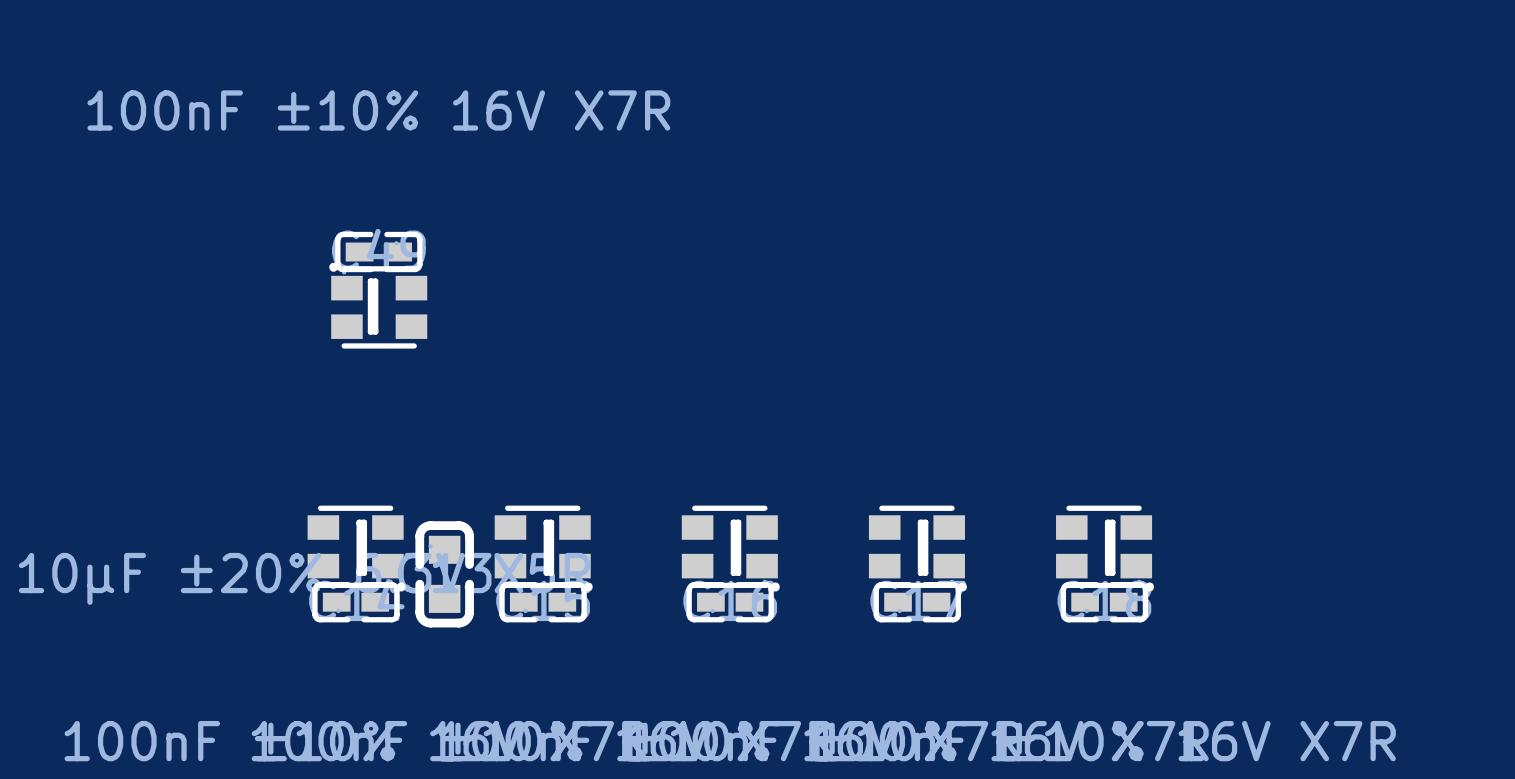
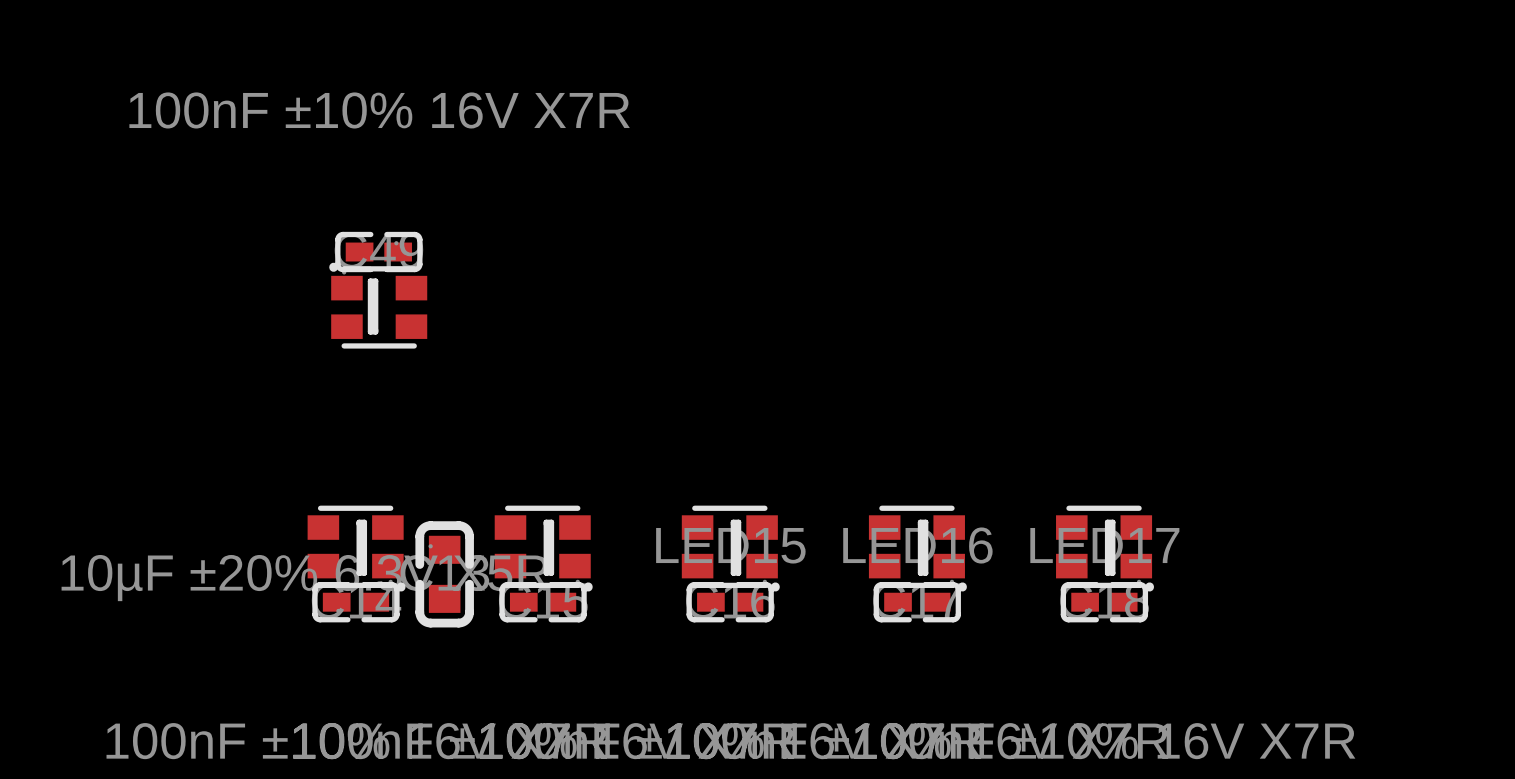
LED15 name: none -> LED15 (730, 545)
LED16 name: none -> LED16 (917, 545)
LED17 name: none -> LED17 (1104, 545)

